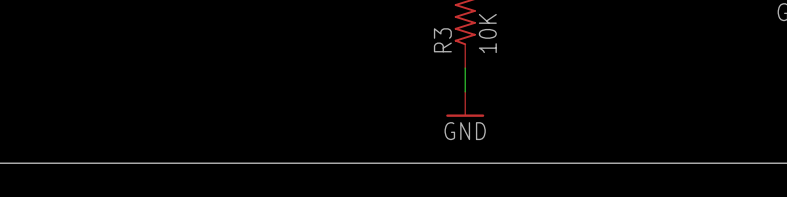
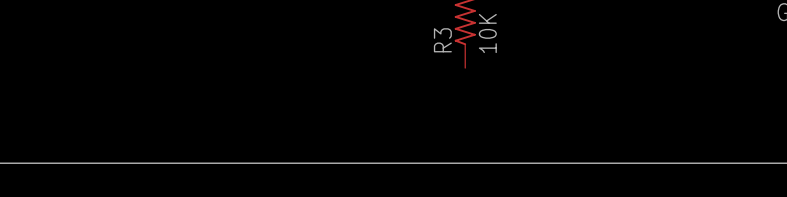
wire: (465, 68) (465, 91) -> none
power symbol: GND (465, 104) -> none

